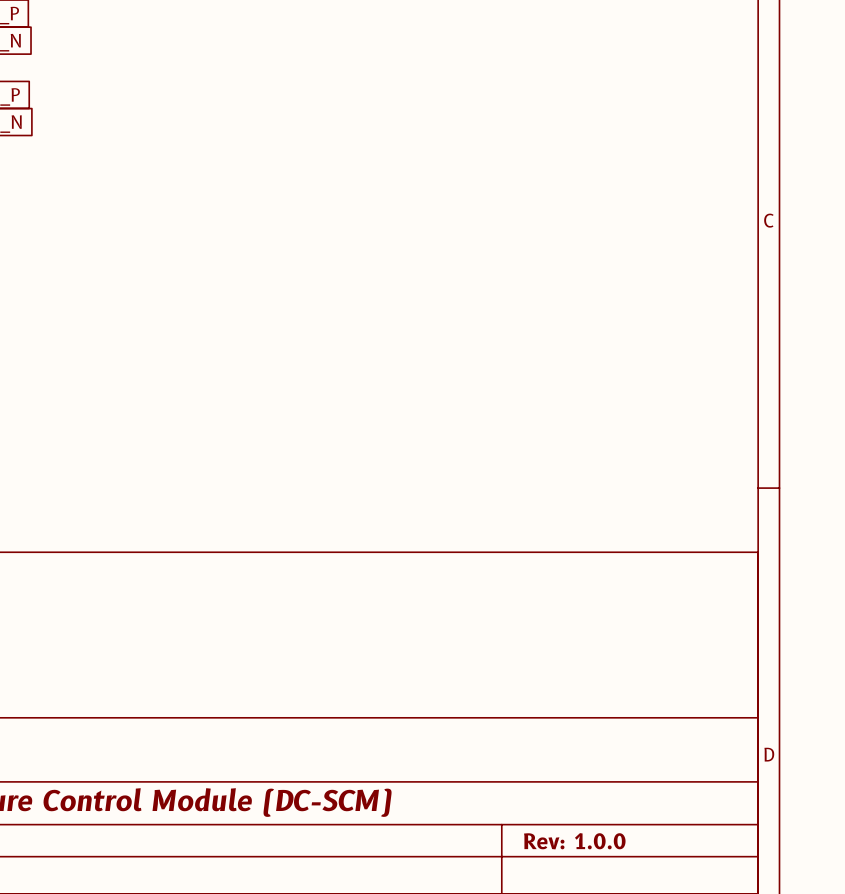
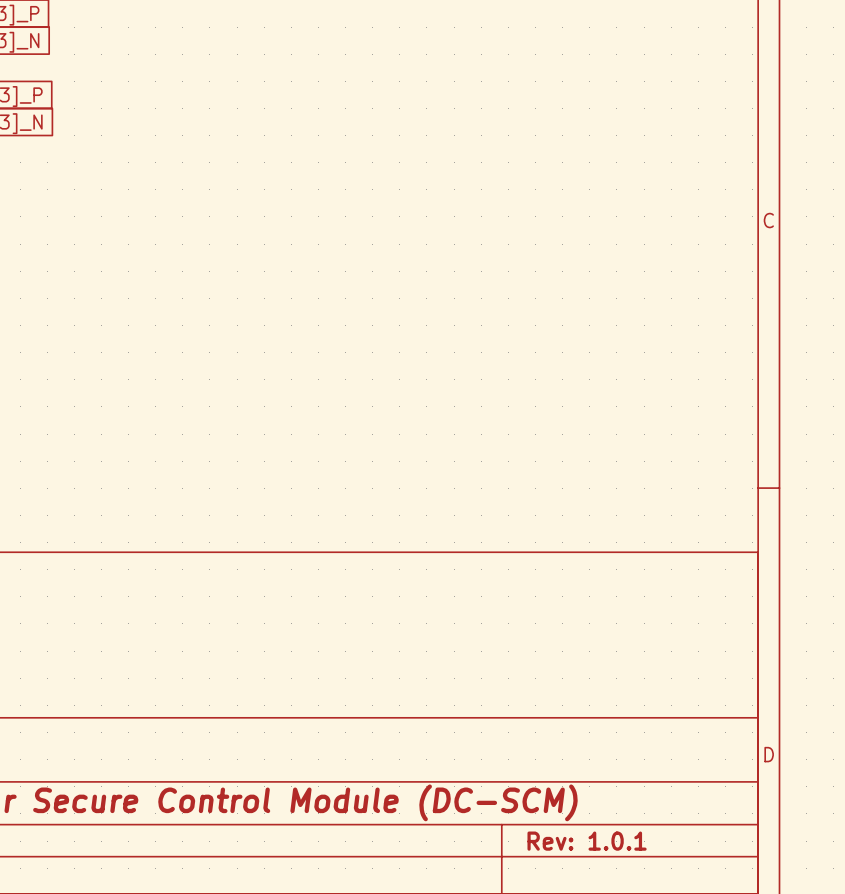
title block: Rev: 1.0.0 (574, 841) -> Rev: 1.0.1 (587, 841)

